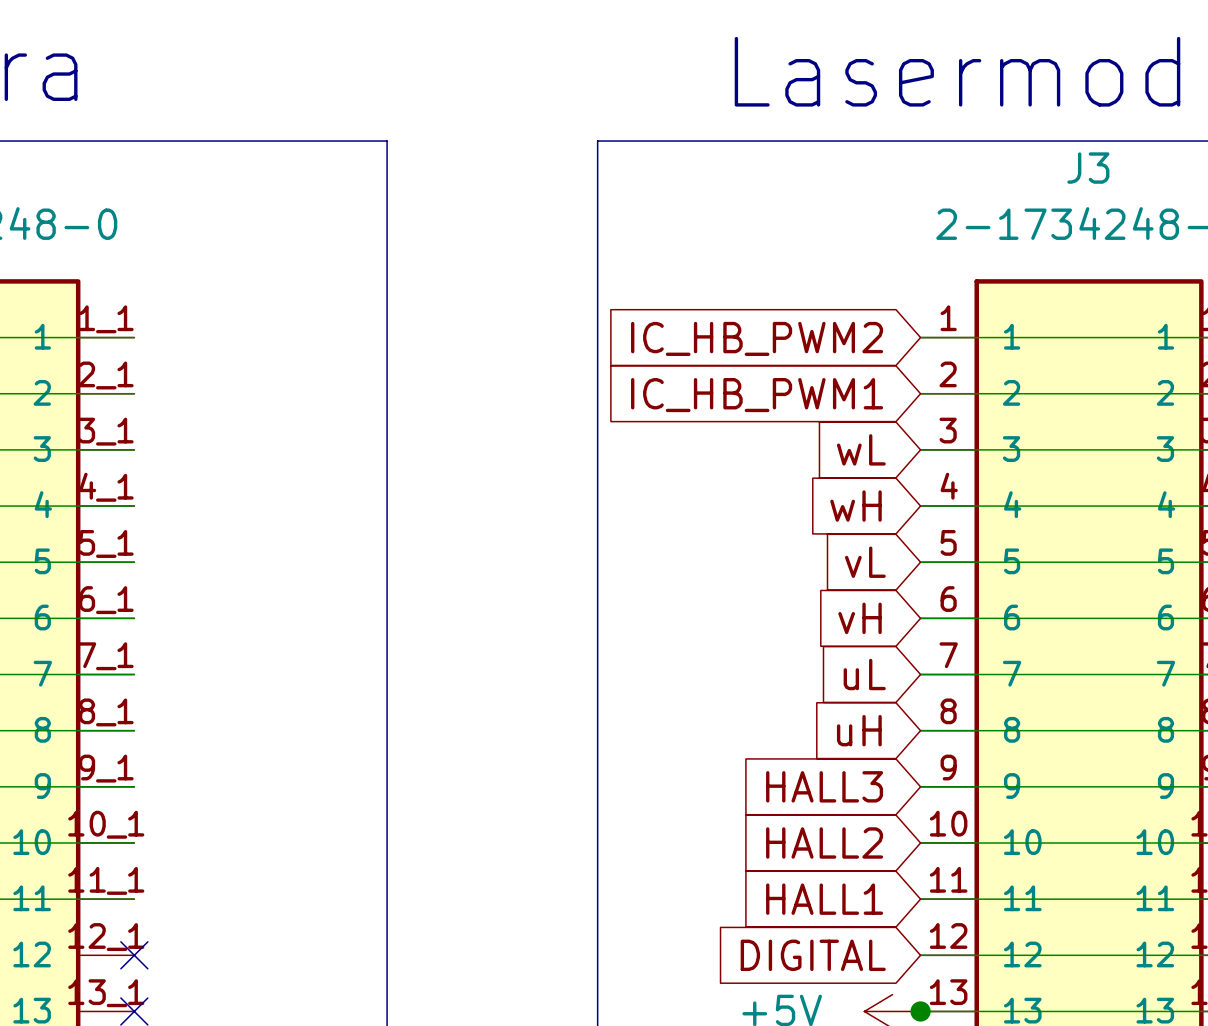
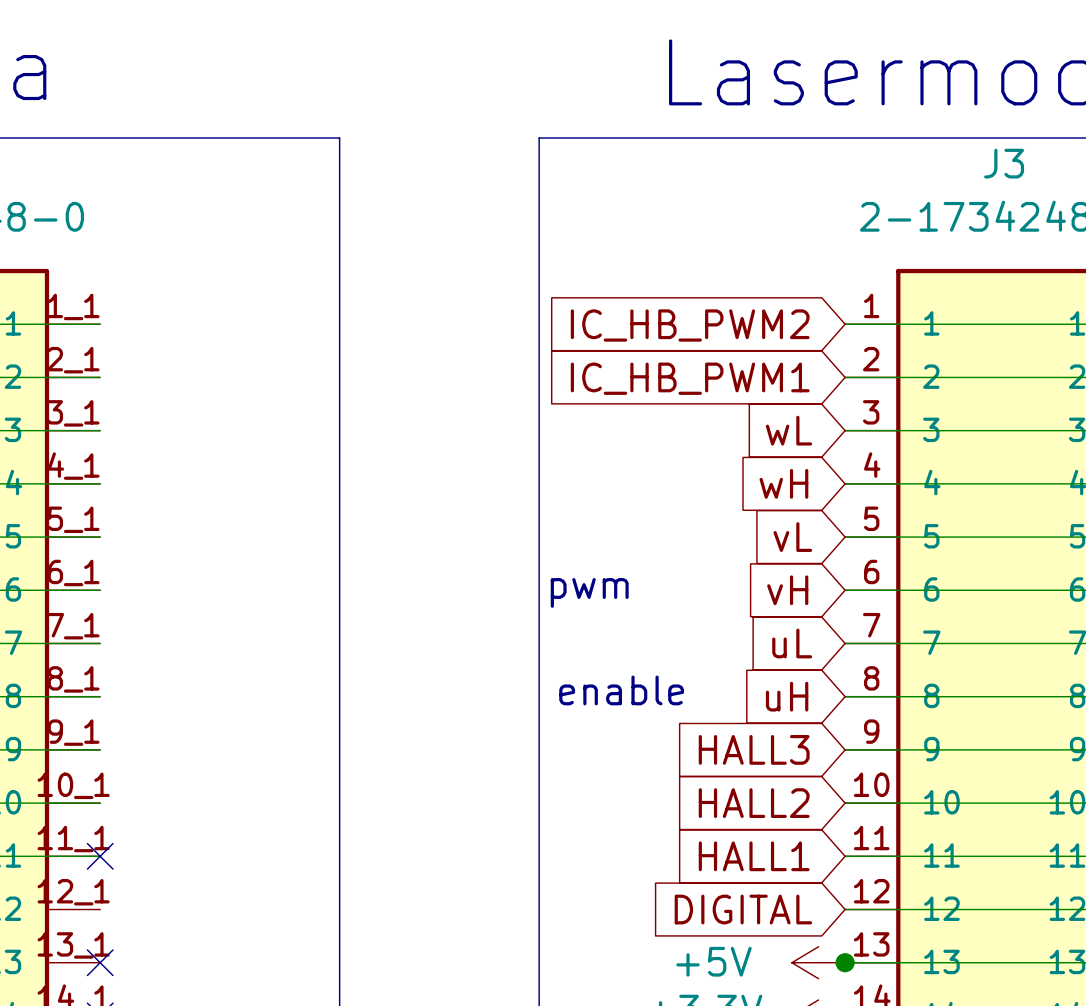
text: none -> pwm (589, 592)
text: none -> enable (621, 690)
no-connect mark position: (134, 955) -> (100, 856)

